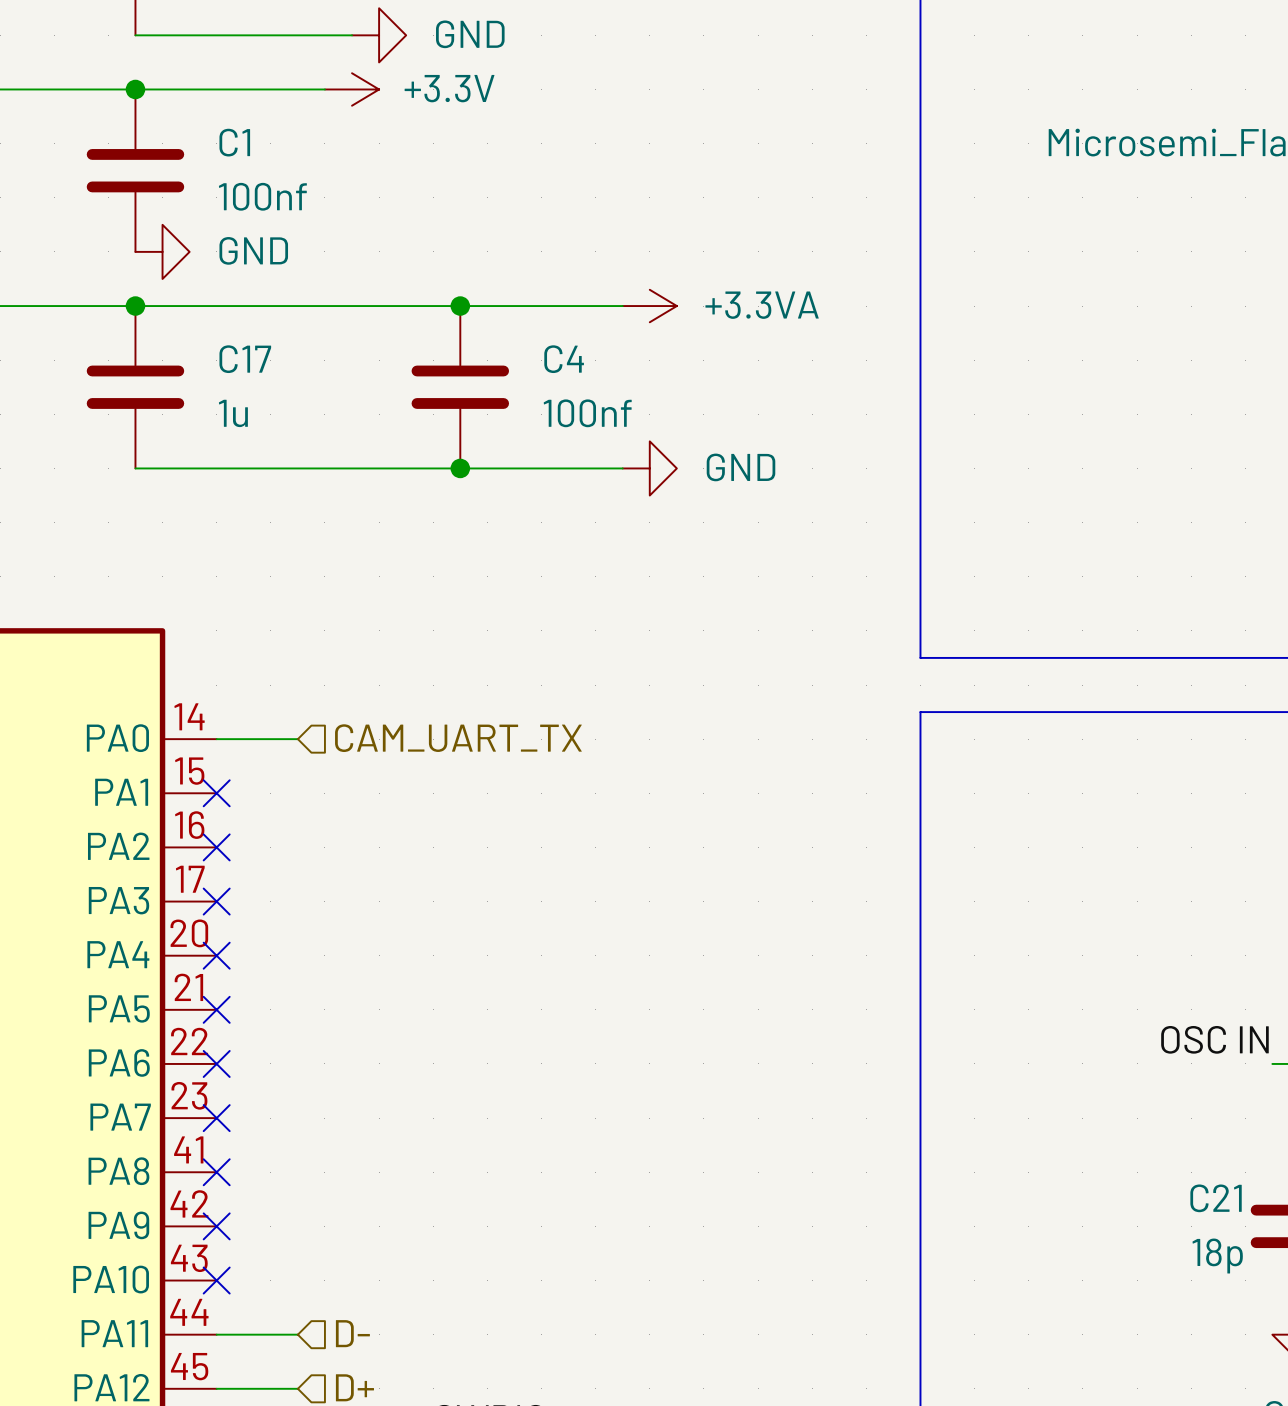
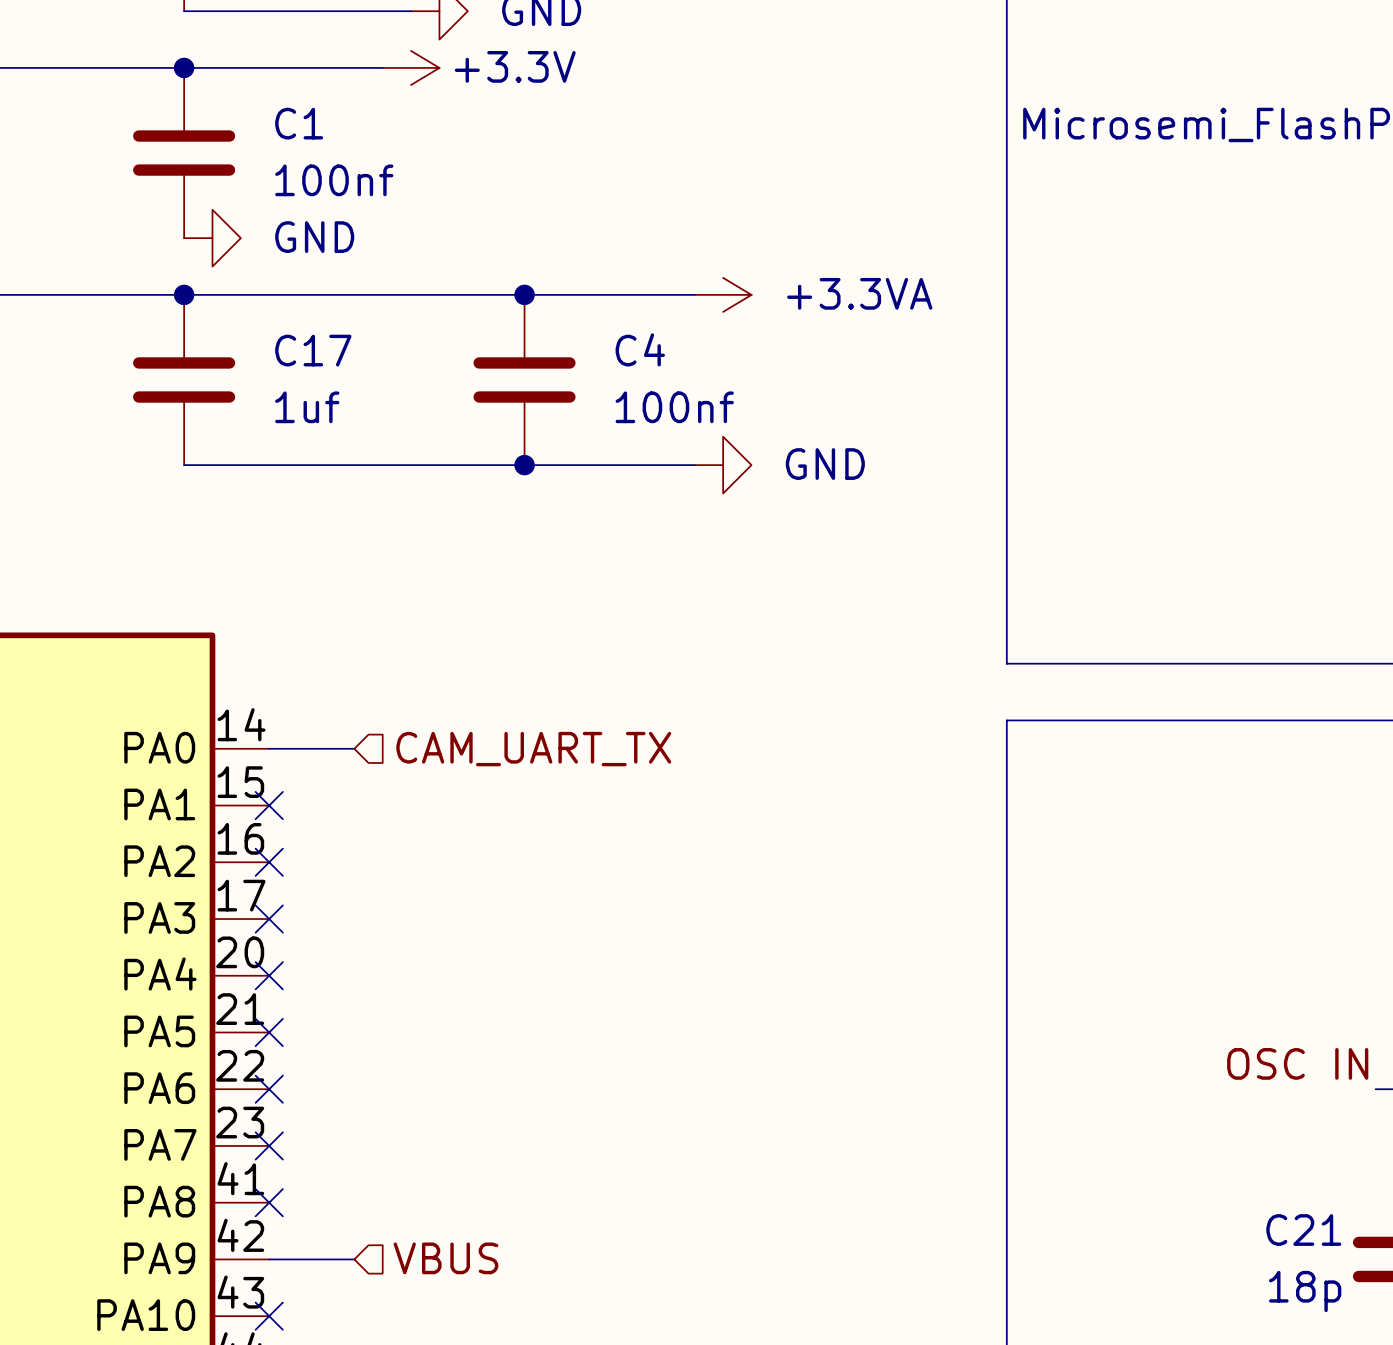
C17 value: 1u (233, 413) -> 1uf (307, 407)
hierarchical label: none -> VBUS (445, 1258)
wire: none -> (269, 1259) (354, 1259)
no-connect mark: (216, 1226) -> none

